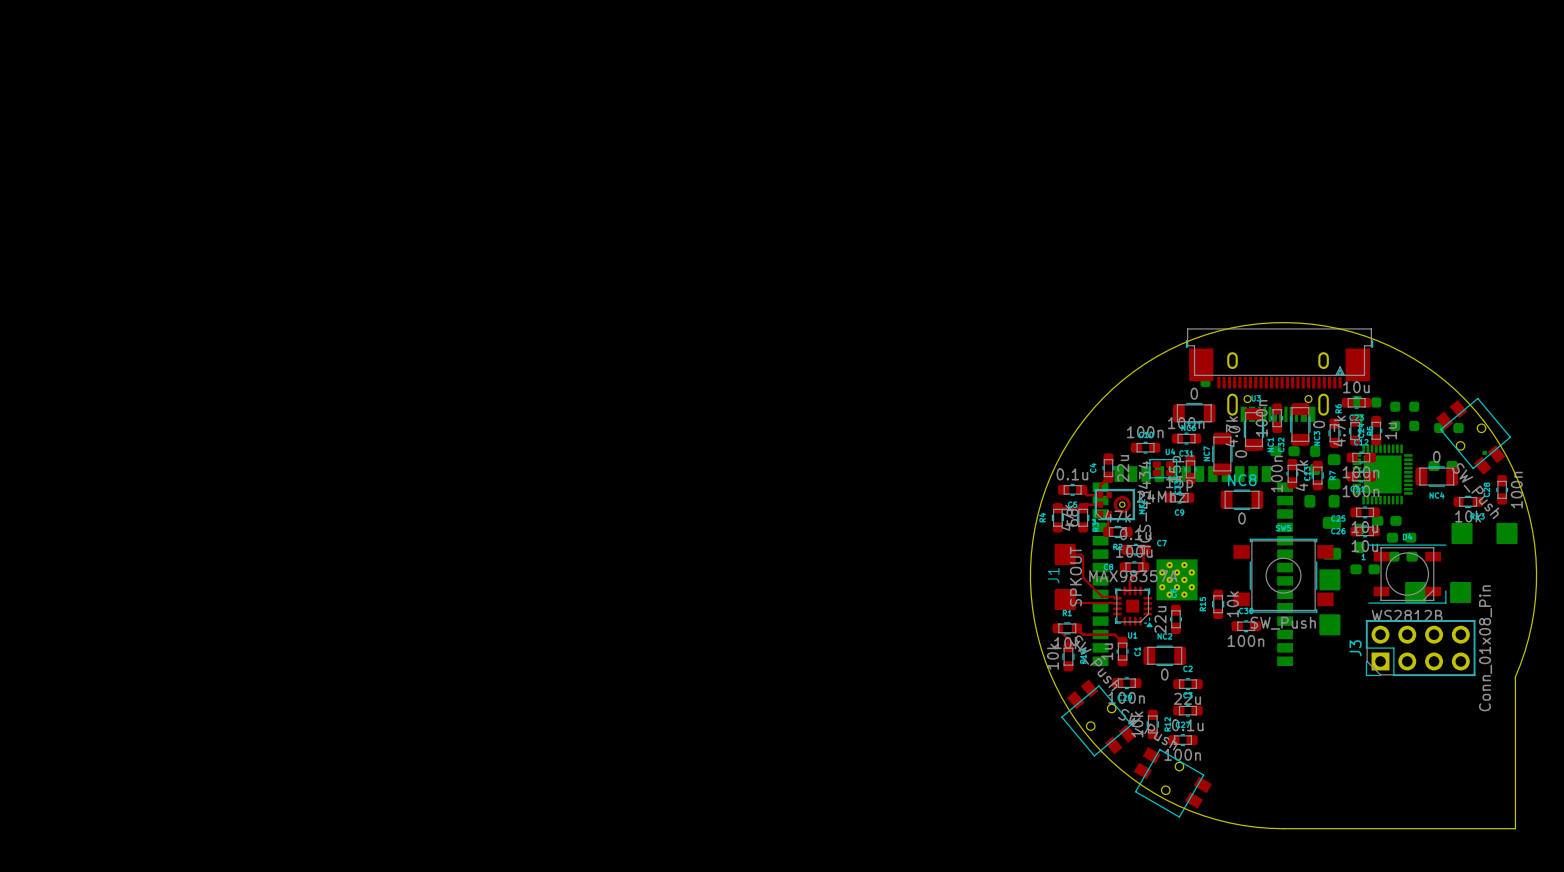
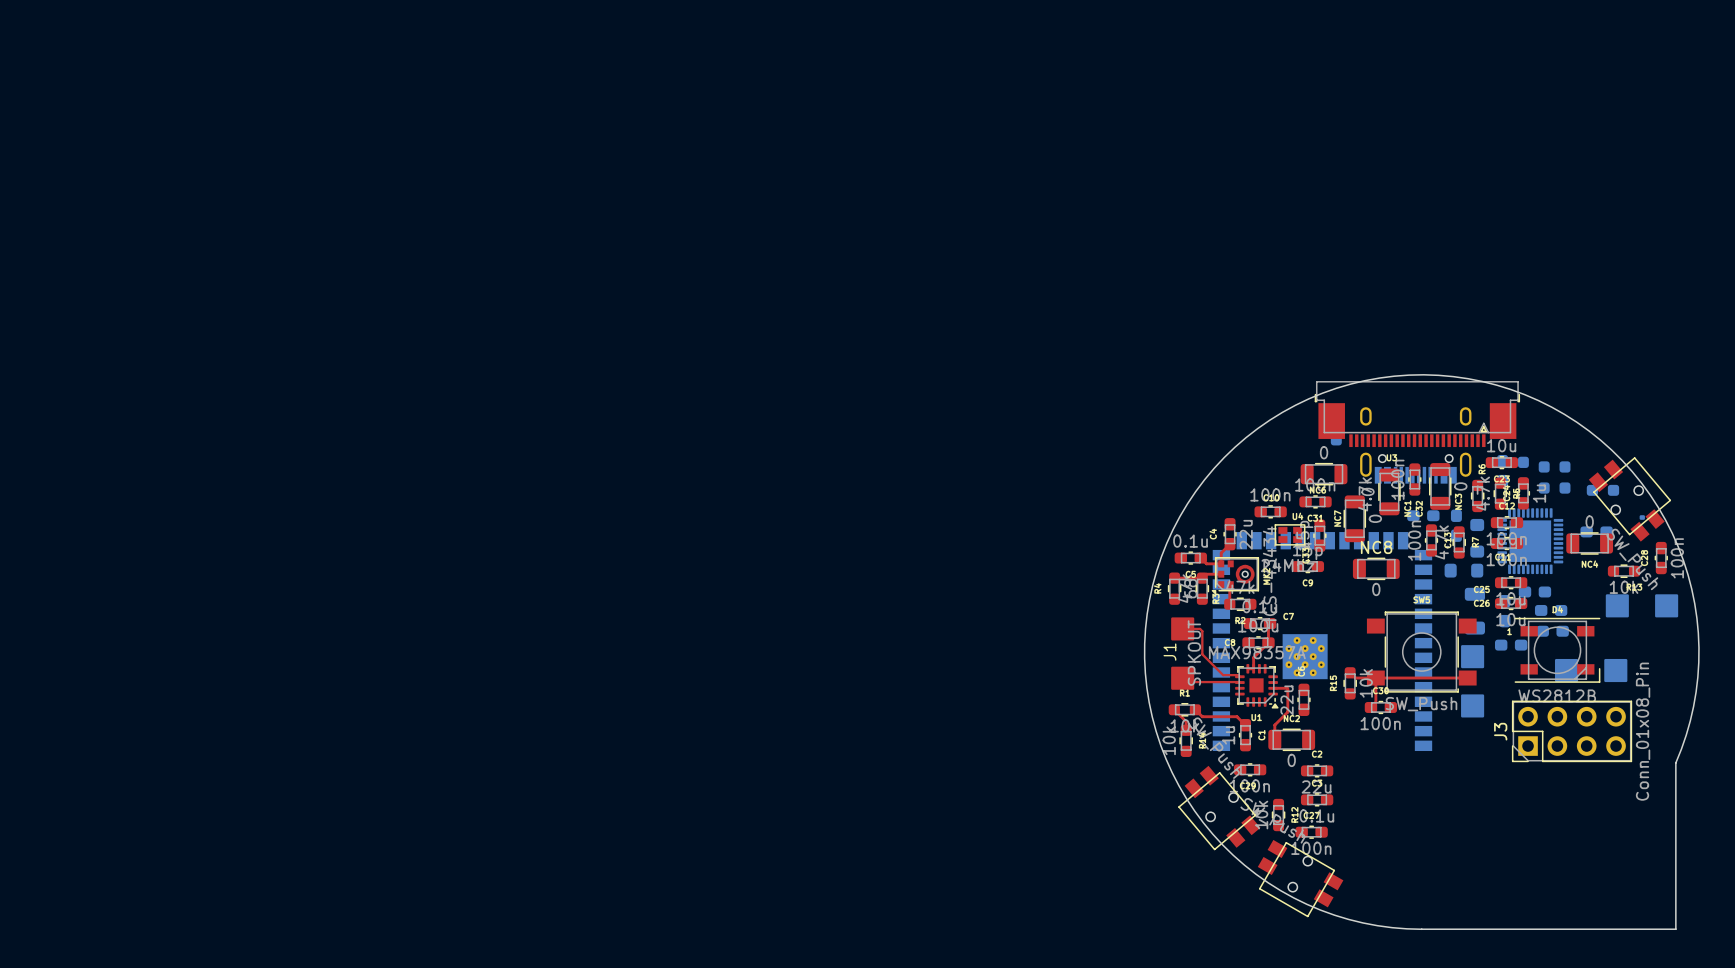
top track: none -> (1350, 672) (1355, 678) (1467, 678)
top track: none -> (1375, 678) (1375, 702) (1370, 707)
top track: none -> (1273, 688) (1287, 688) (1287, 712) (1274, 725) (1274, 739)

